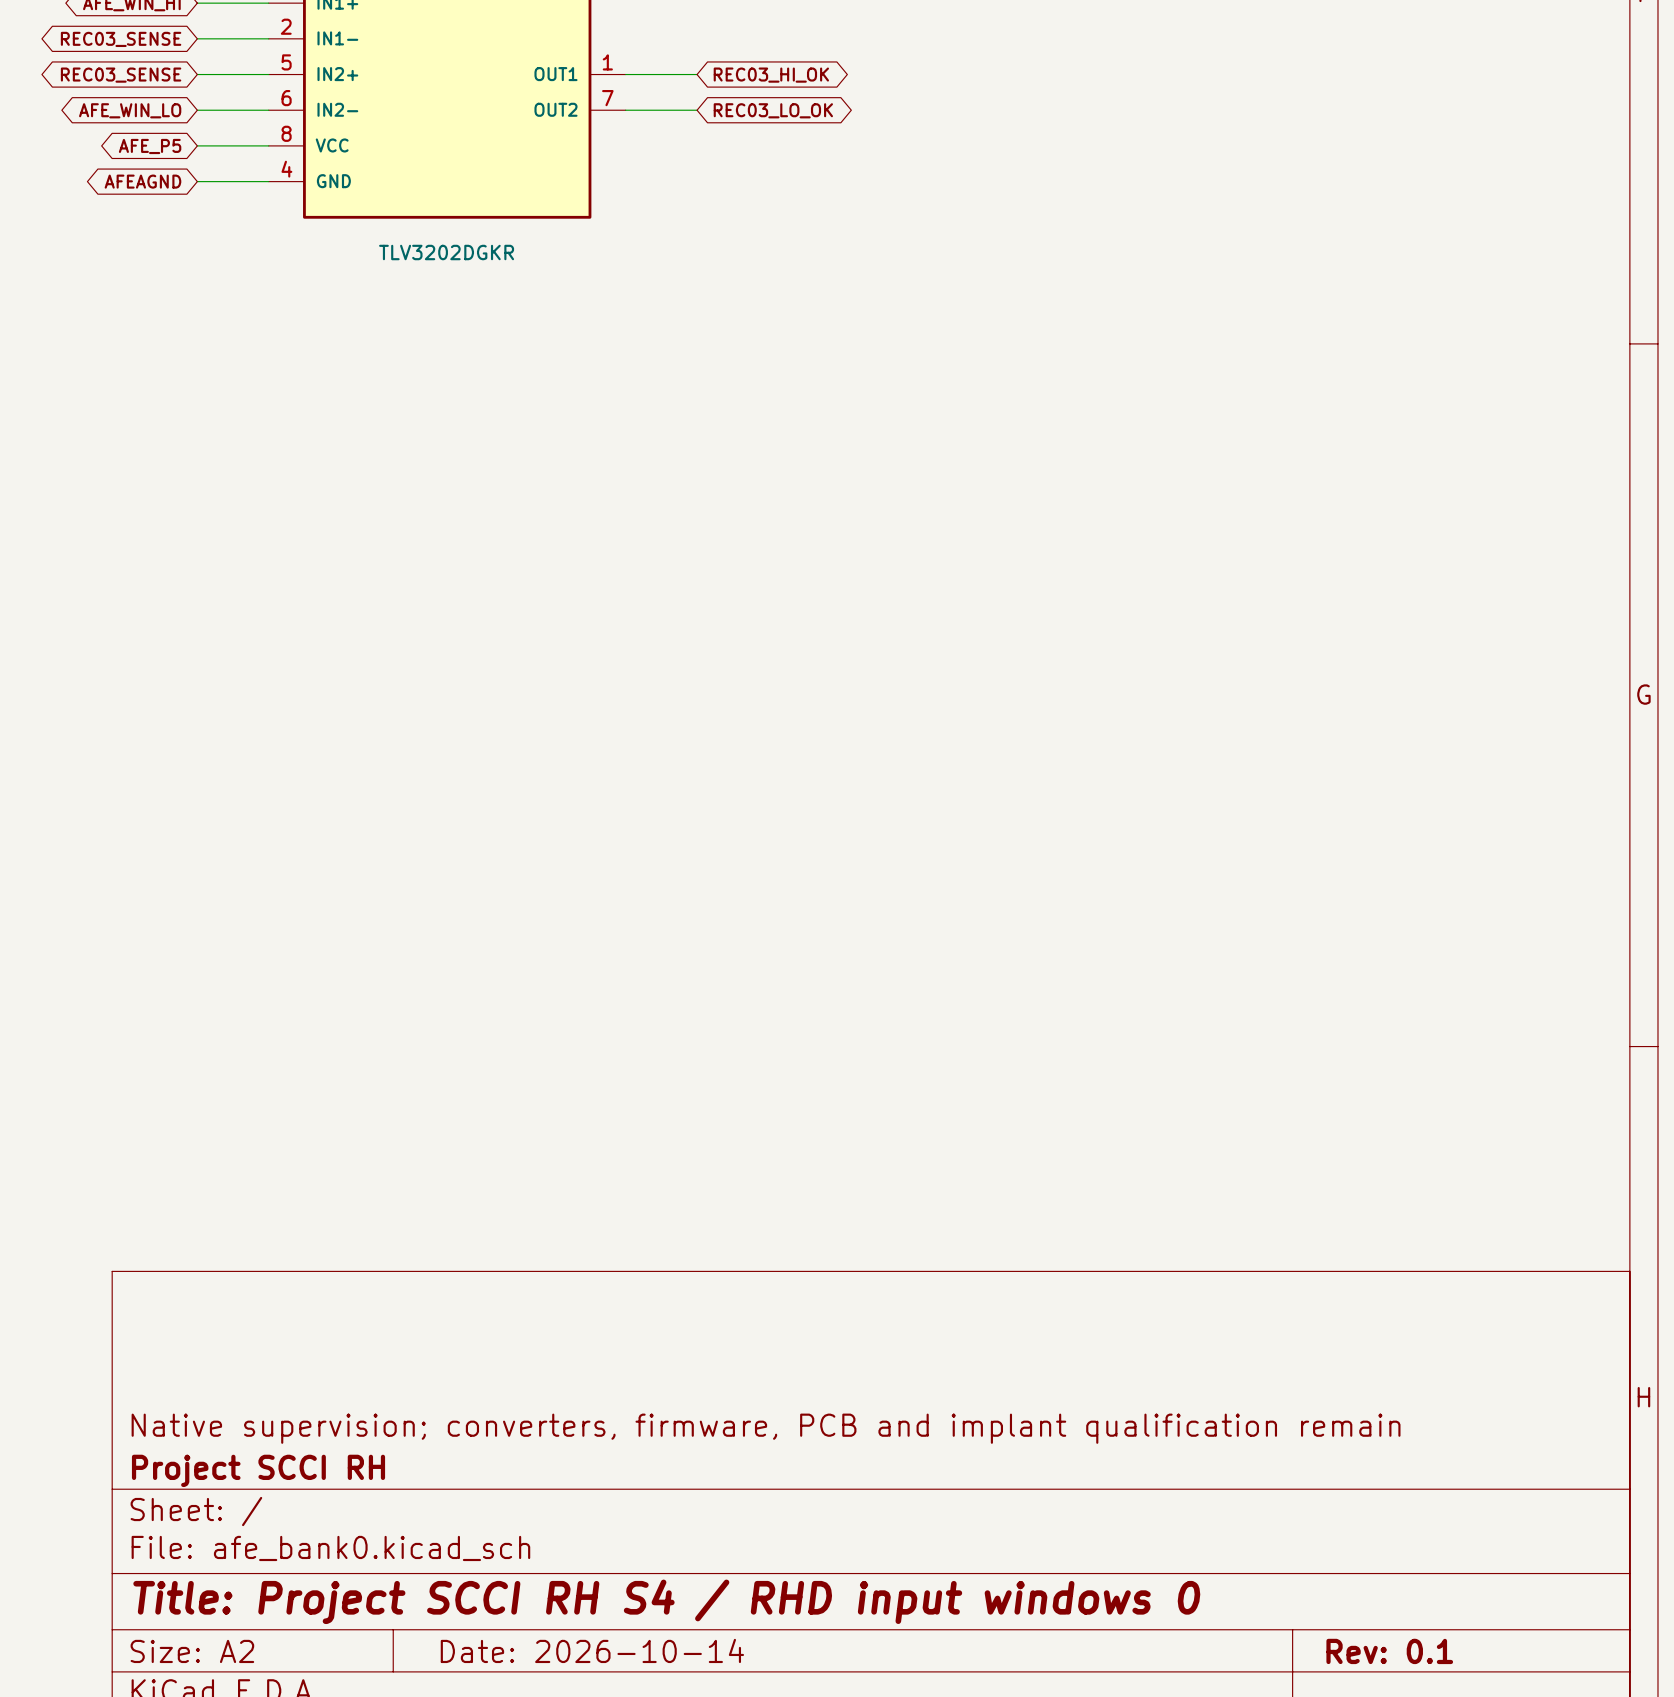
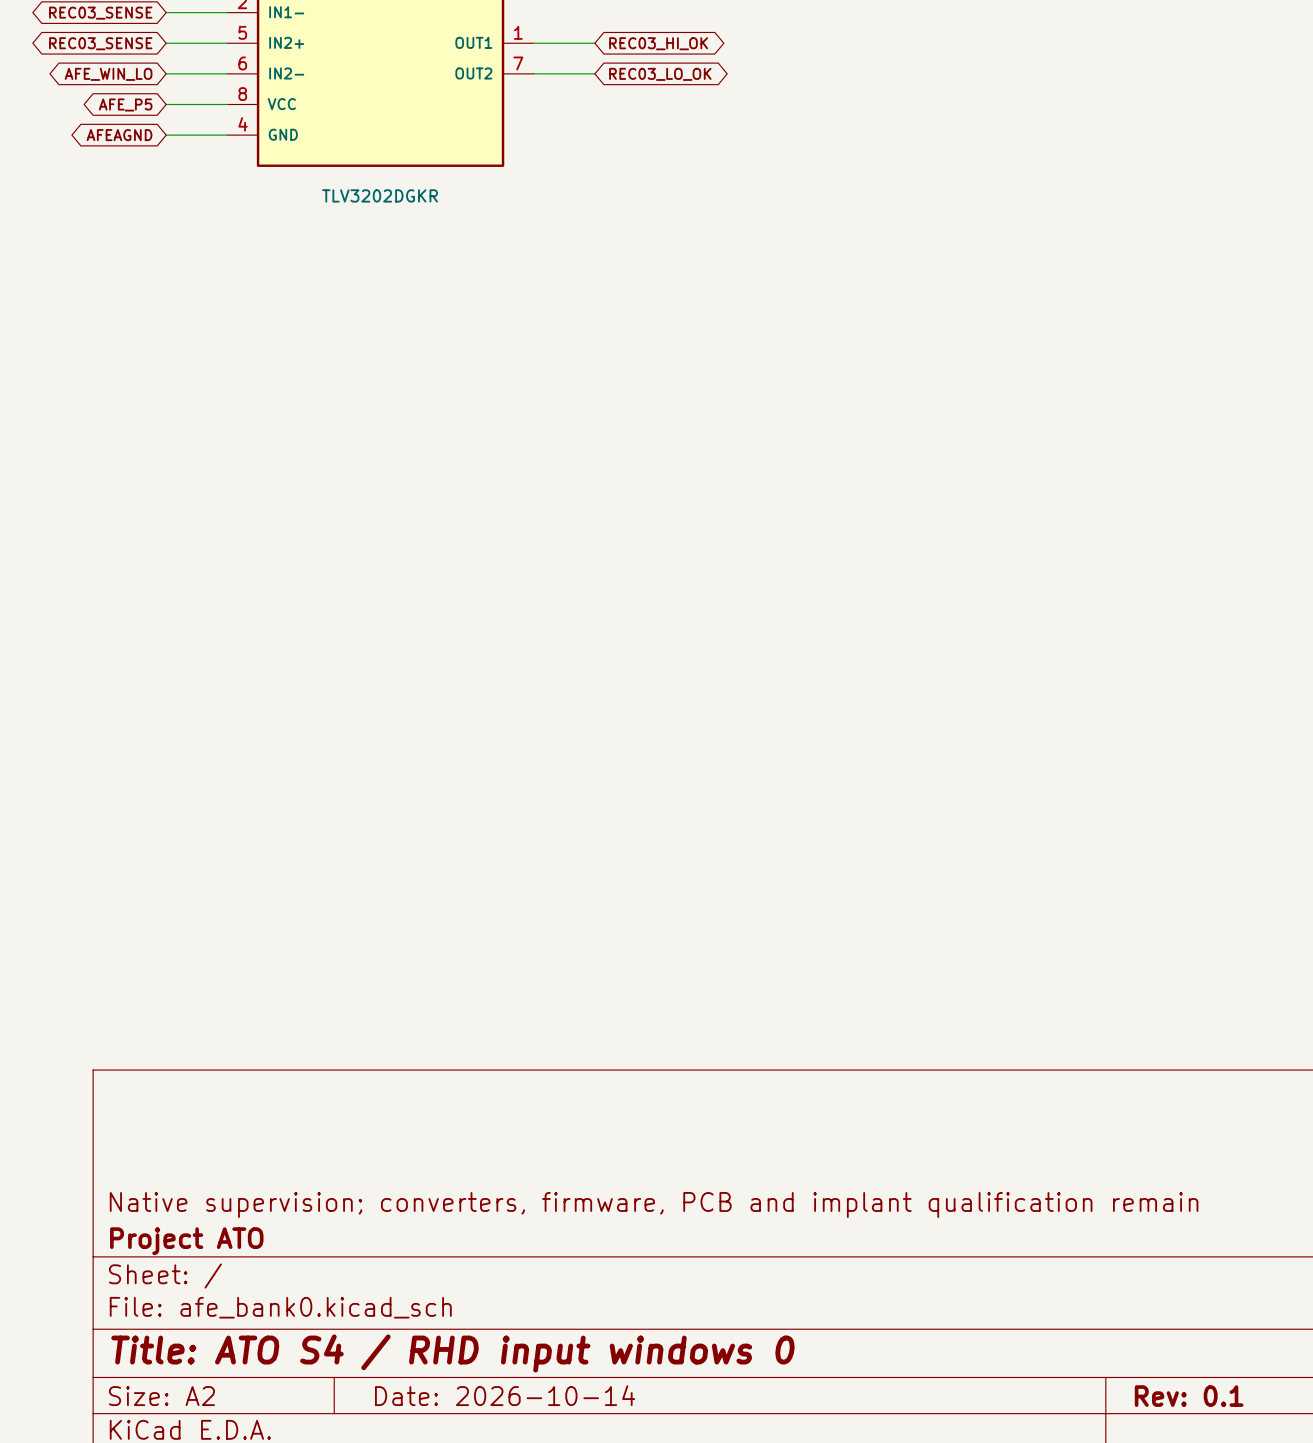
title block: Project SCCI RH (258, 1470) -> Project ATO (186, 1241)
title block: Title: Project SCCI RH S4 / RHD input windows 0 (666, 1601) -> Title: ATO S4 / RHD input windows 0 (452, 1353)

